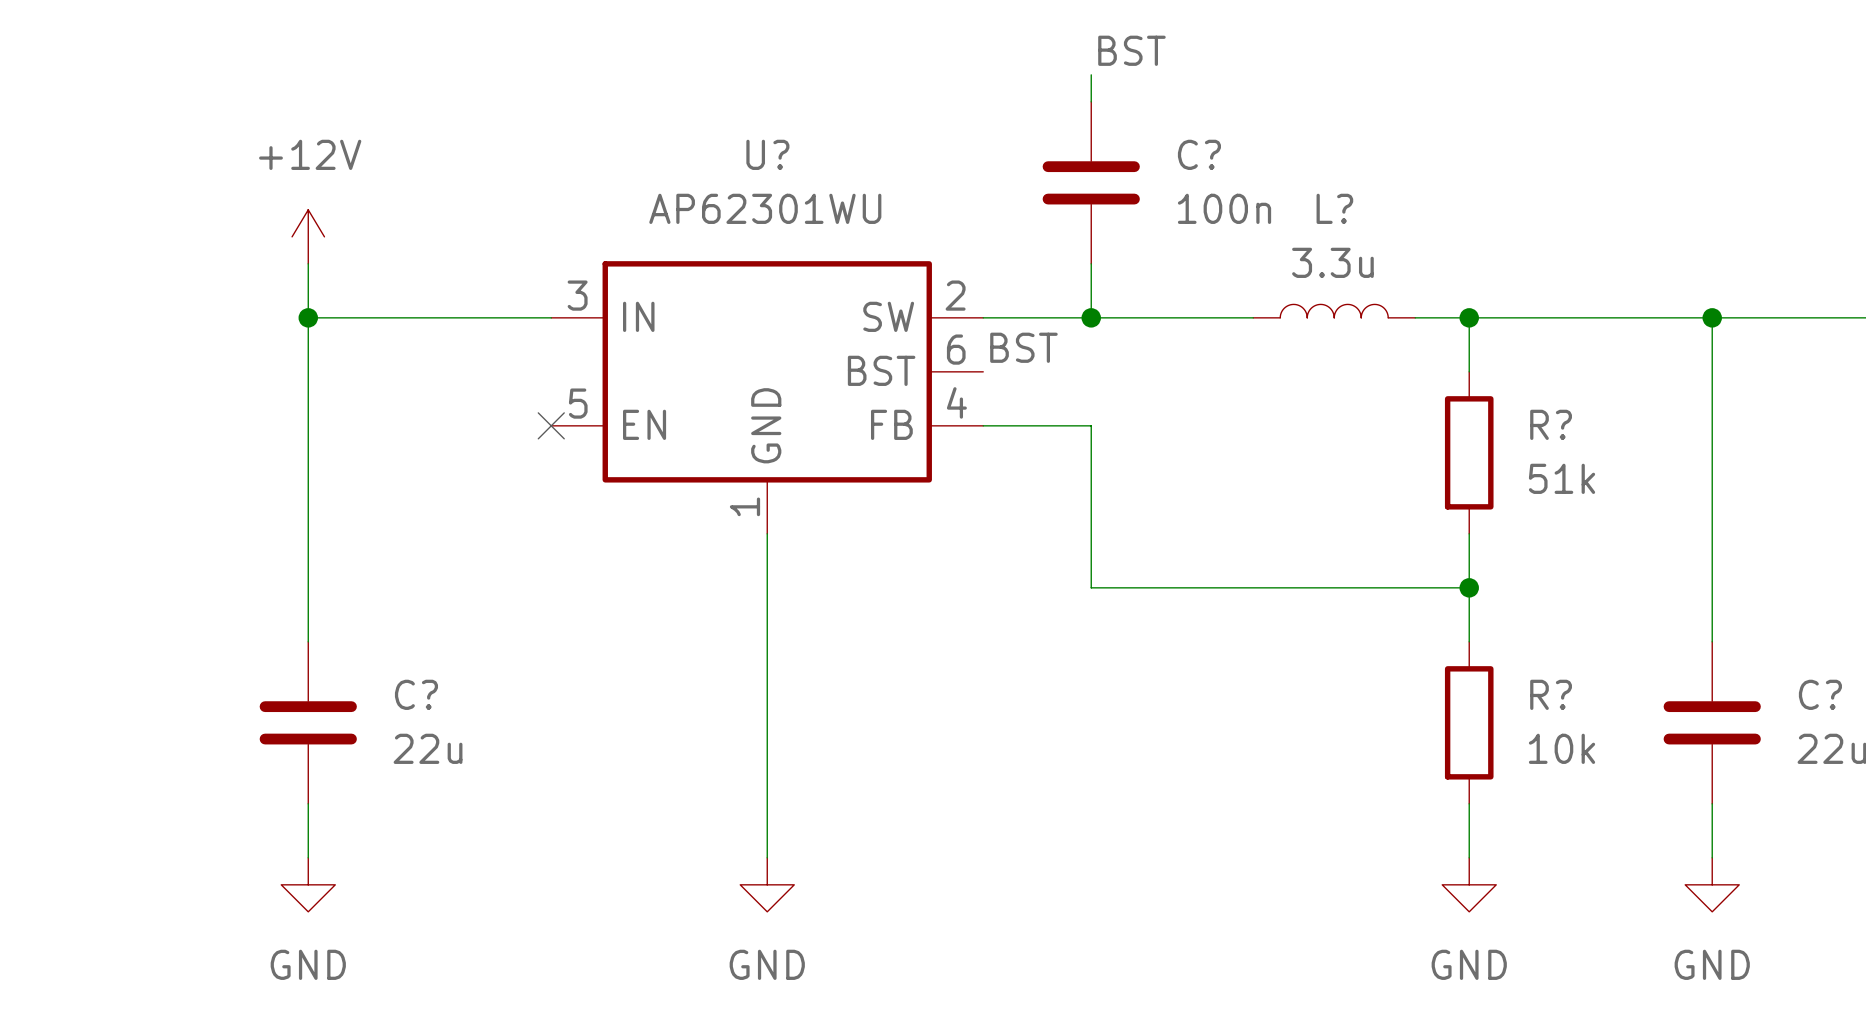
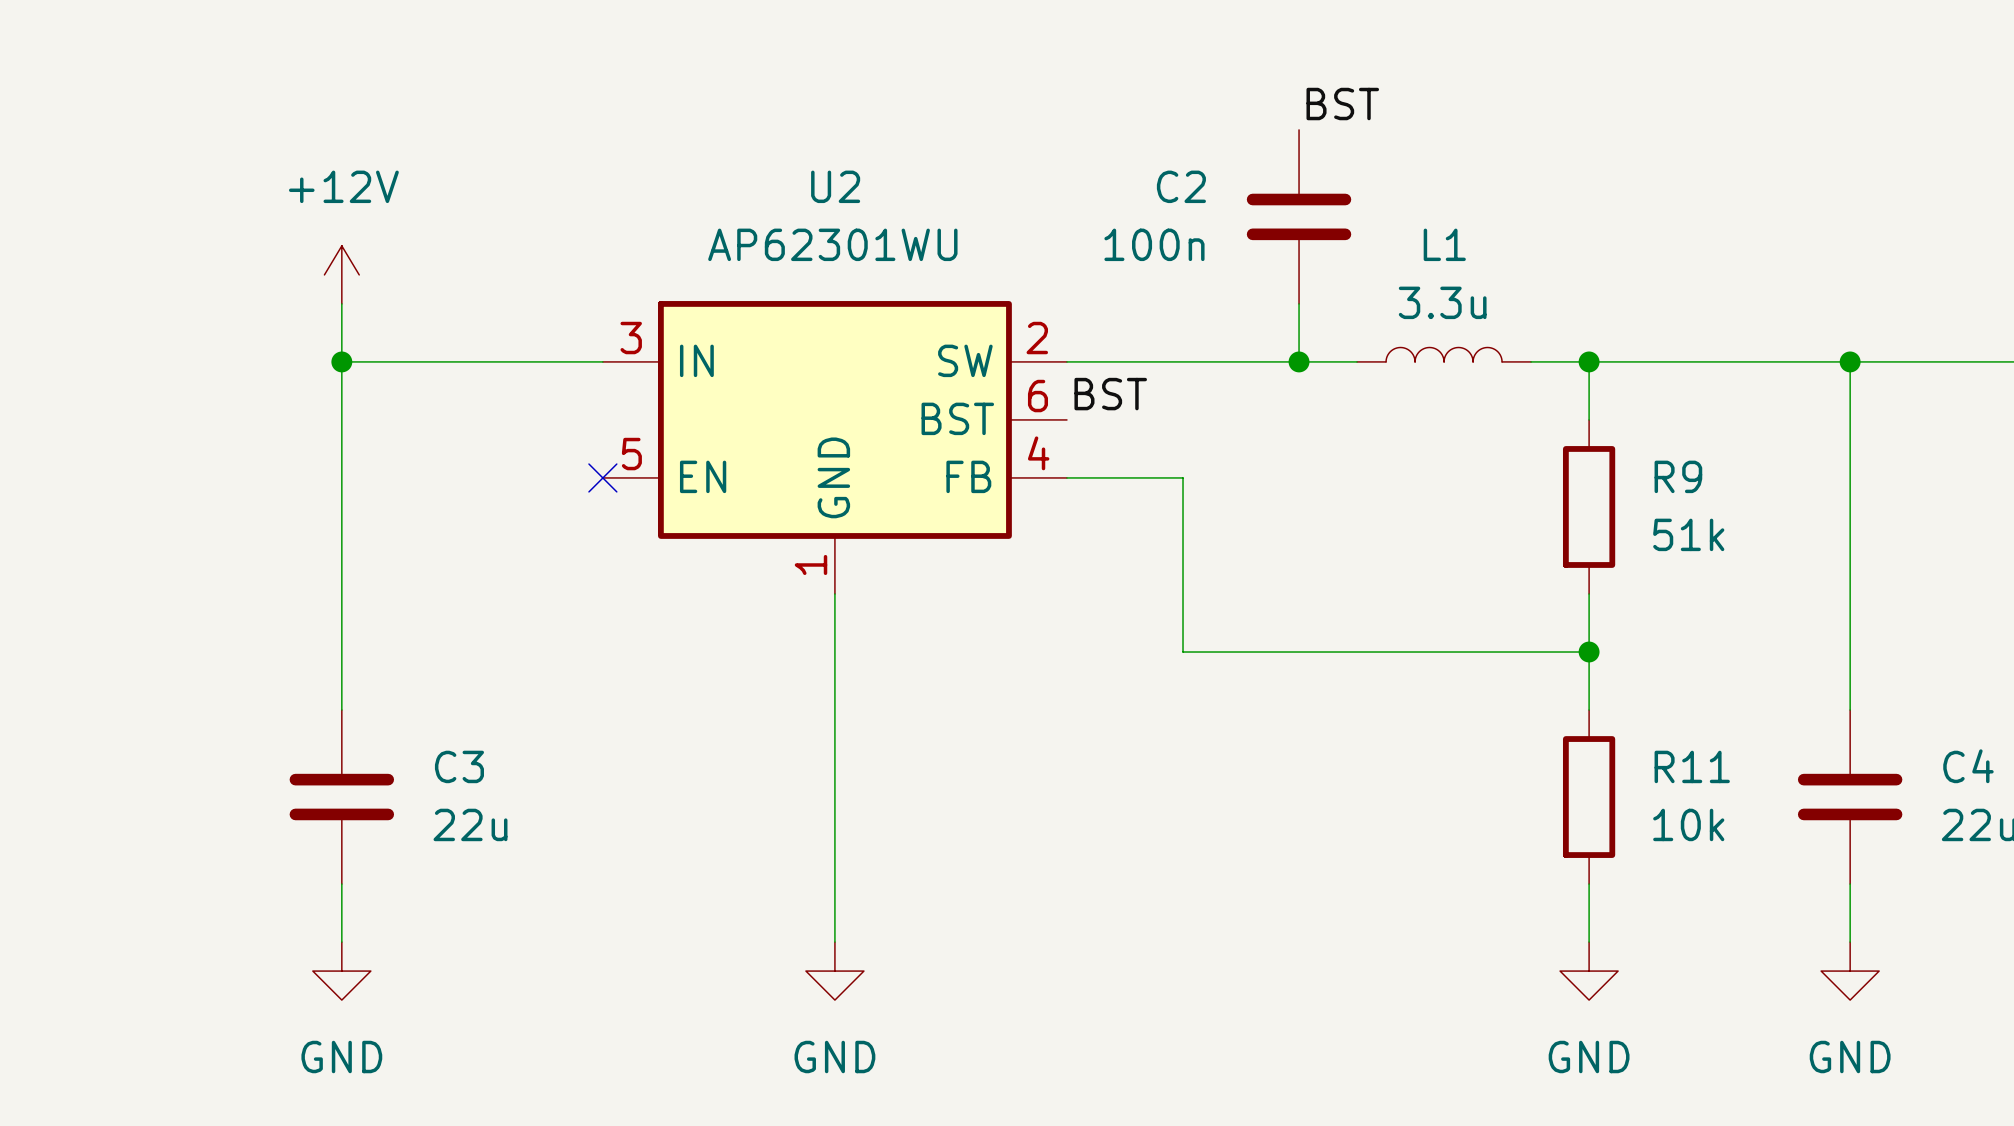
label position: BST (1131, 50) -> BST (1342, 104)
wire: (1091, 74) (1091, 101) -> none
U? name: U? (767, 154) -> U2 (835, 186)
C?: 100n (1091, 182) -> none
C2: none -> 100n (1299, 216)
L? name: L? (1334, 208) -> L1 (1444, 244)
wire: (1091, 263) (1091, 317) -> (1299, 303) (1299, 361)
junction position: (1091, 317) -> (1299, 361)
R? name: R? (1551, 424) -> R9 (1678, 476)
C? name: C? (416, 694) -> C3 (459, 766)
R? name: R? (1551, 694) -> R11 (1692, 766)
C? name: C? (1820, 694) -> C4 (1968, 766)

